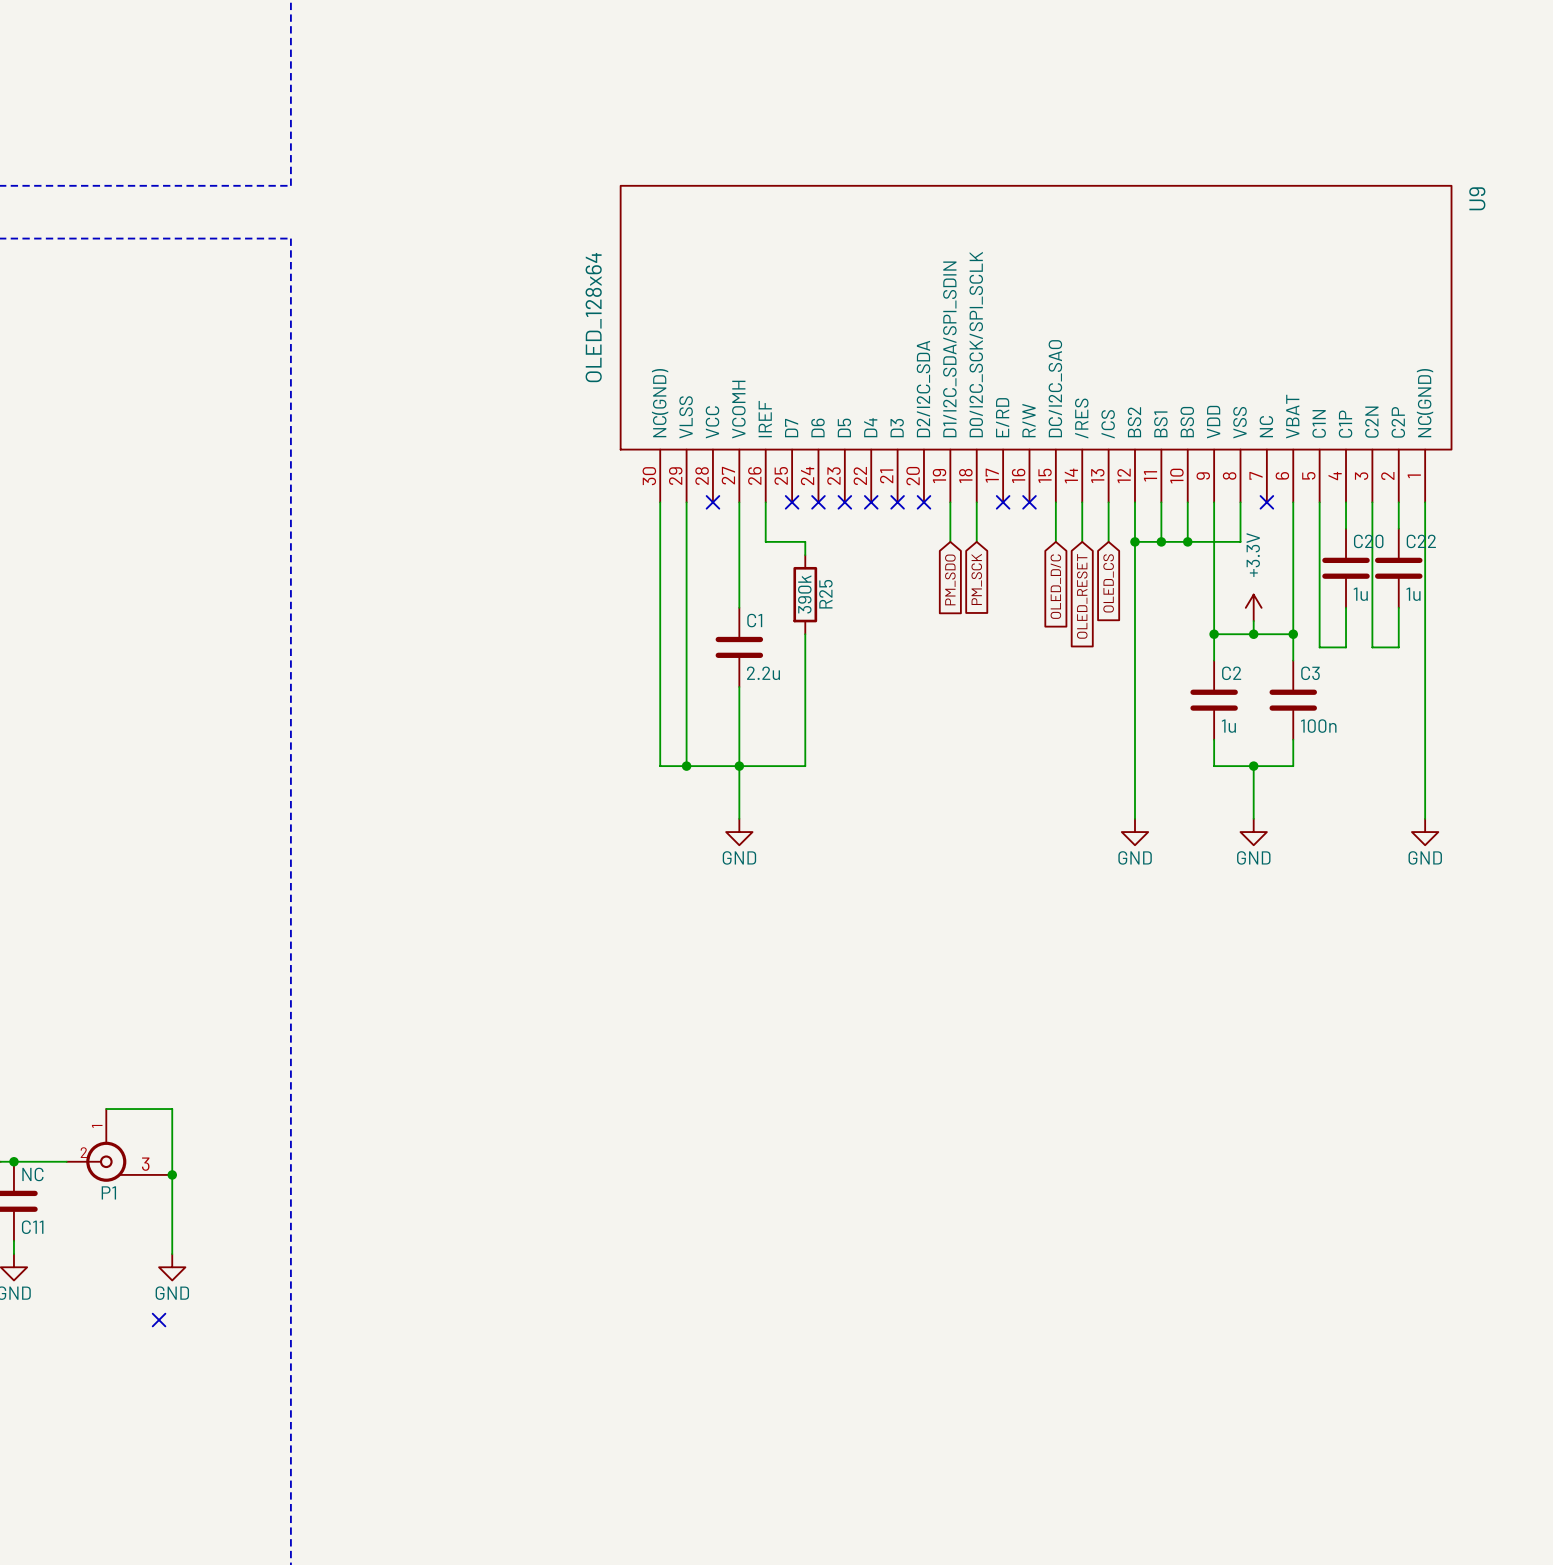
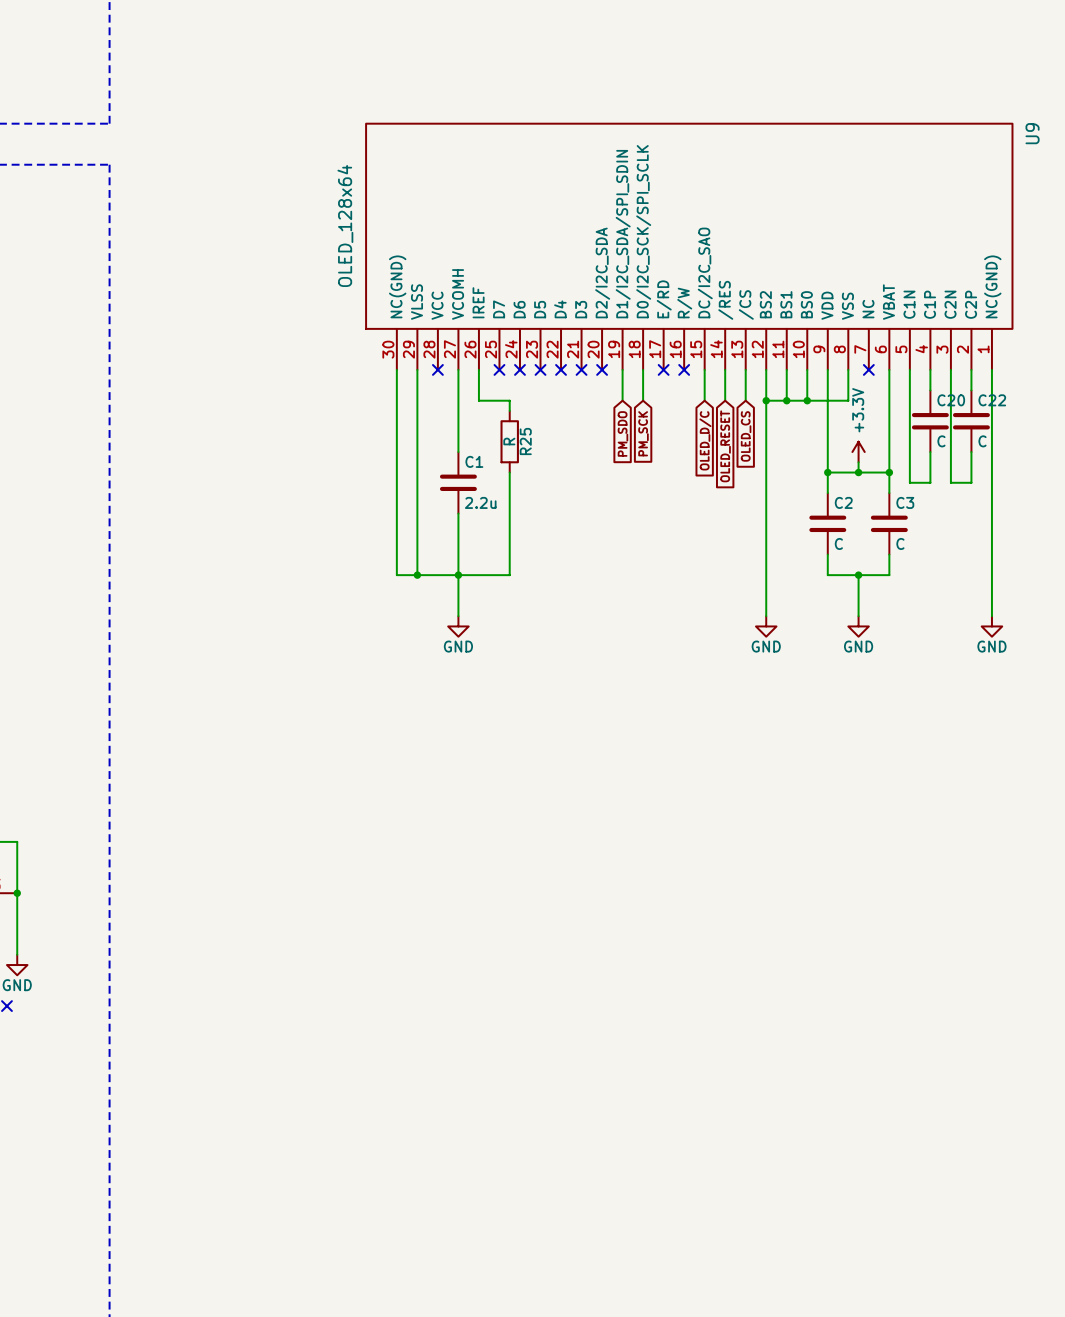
R25 value: 390k (804, 594) -> R (509, 441)
C20 value: 1u (1360, 594) -> C (941, 441)
C22 value: 1u (1413, 594) -> C (982, 441)
C2 value: 1u (1228, 726) -> C (838, 543)
C3 value: 100n (1318, 726) -> C (900, 543)

